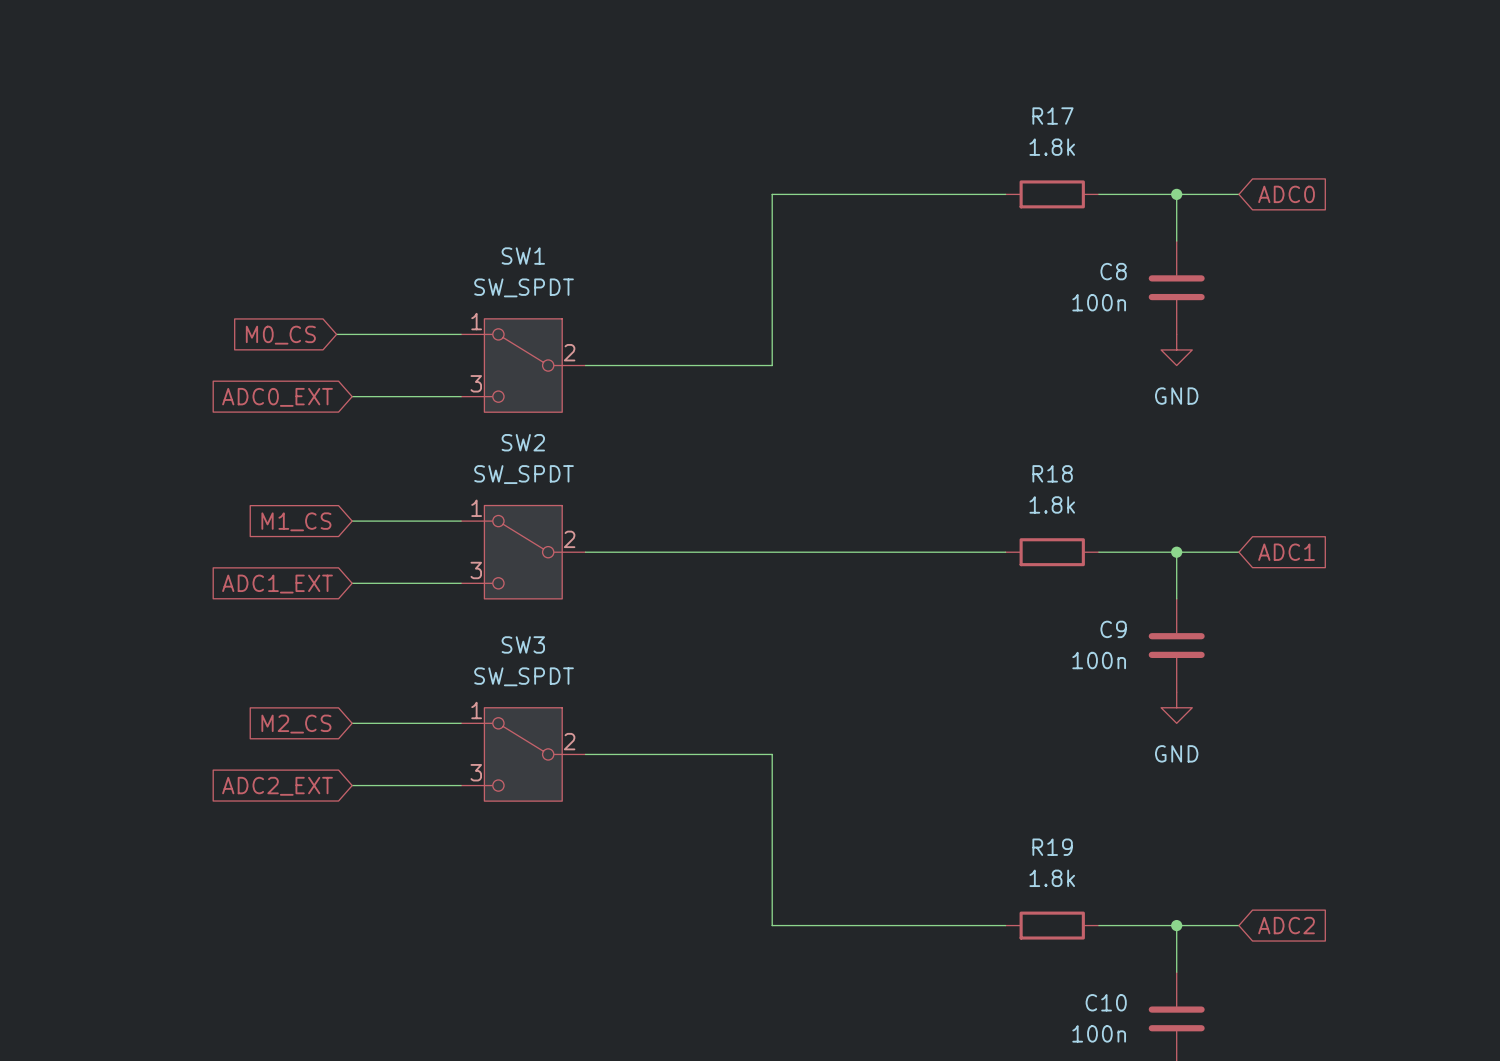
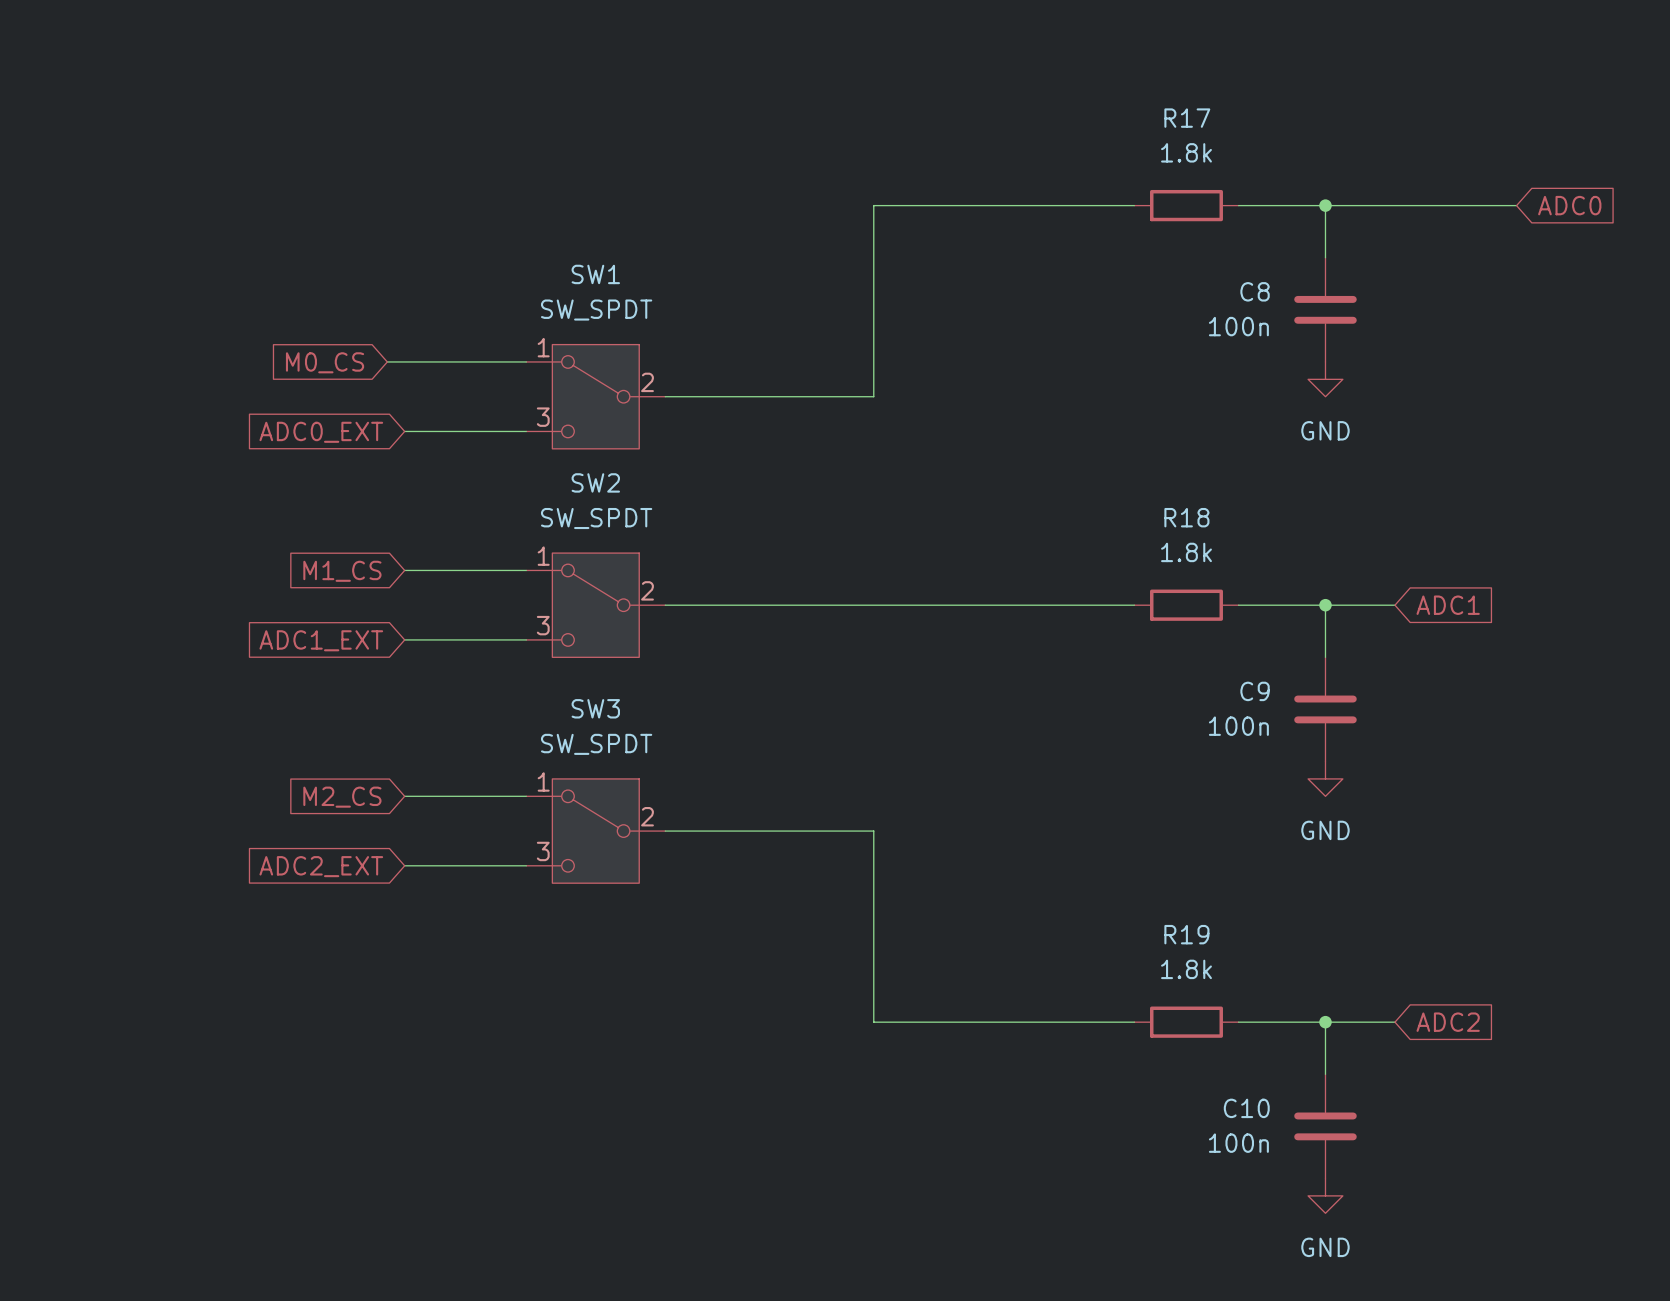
wire: none -> (1394, 205) (1516, 205)
global label position: ADC0 (1286, 194) -> ADC0 (1569, 205)

